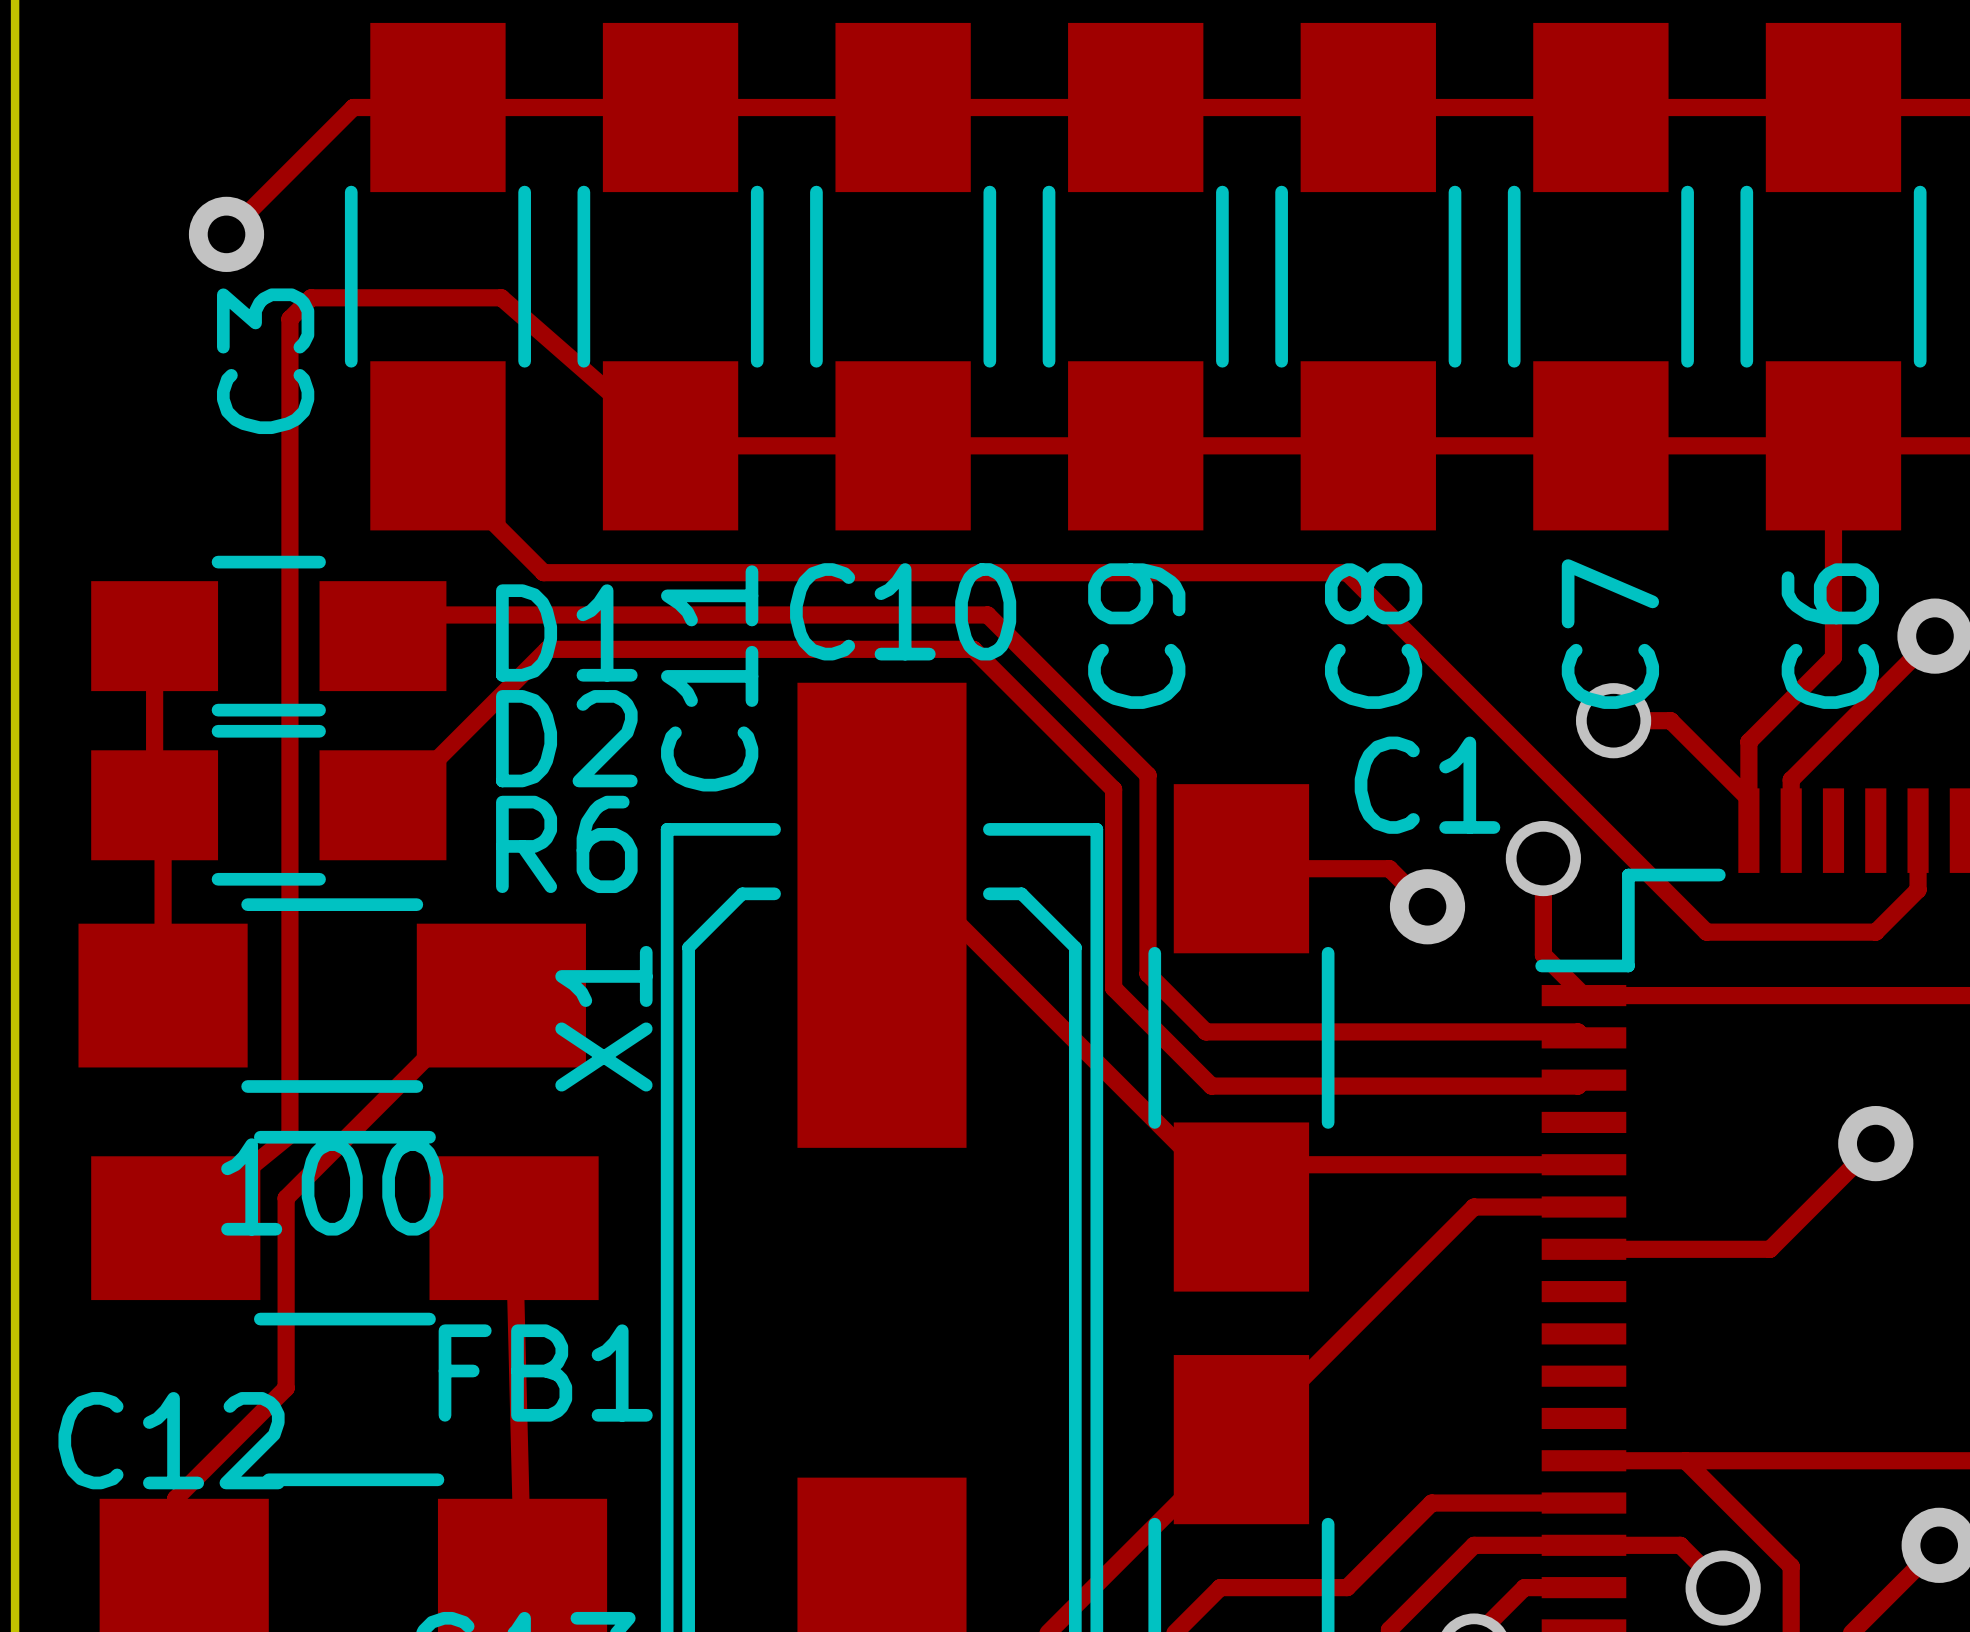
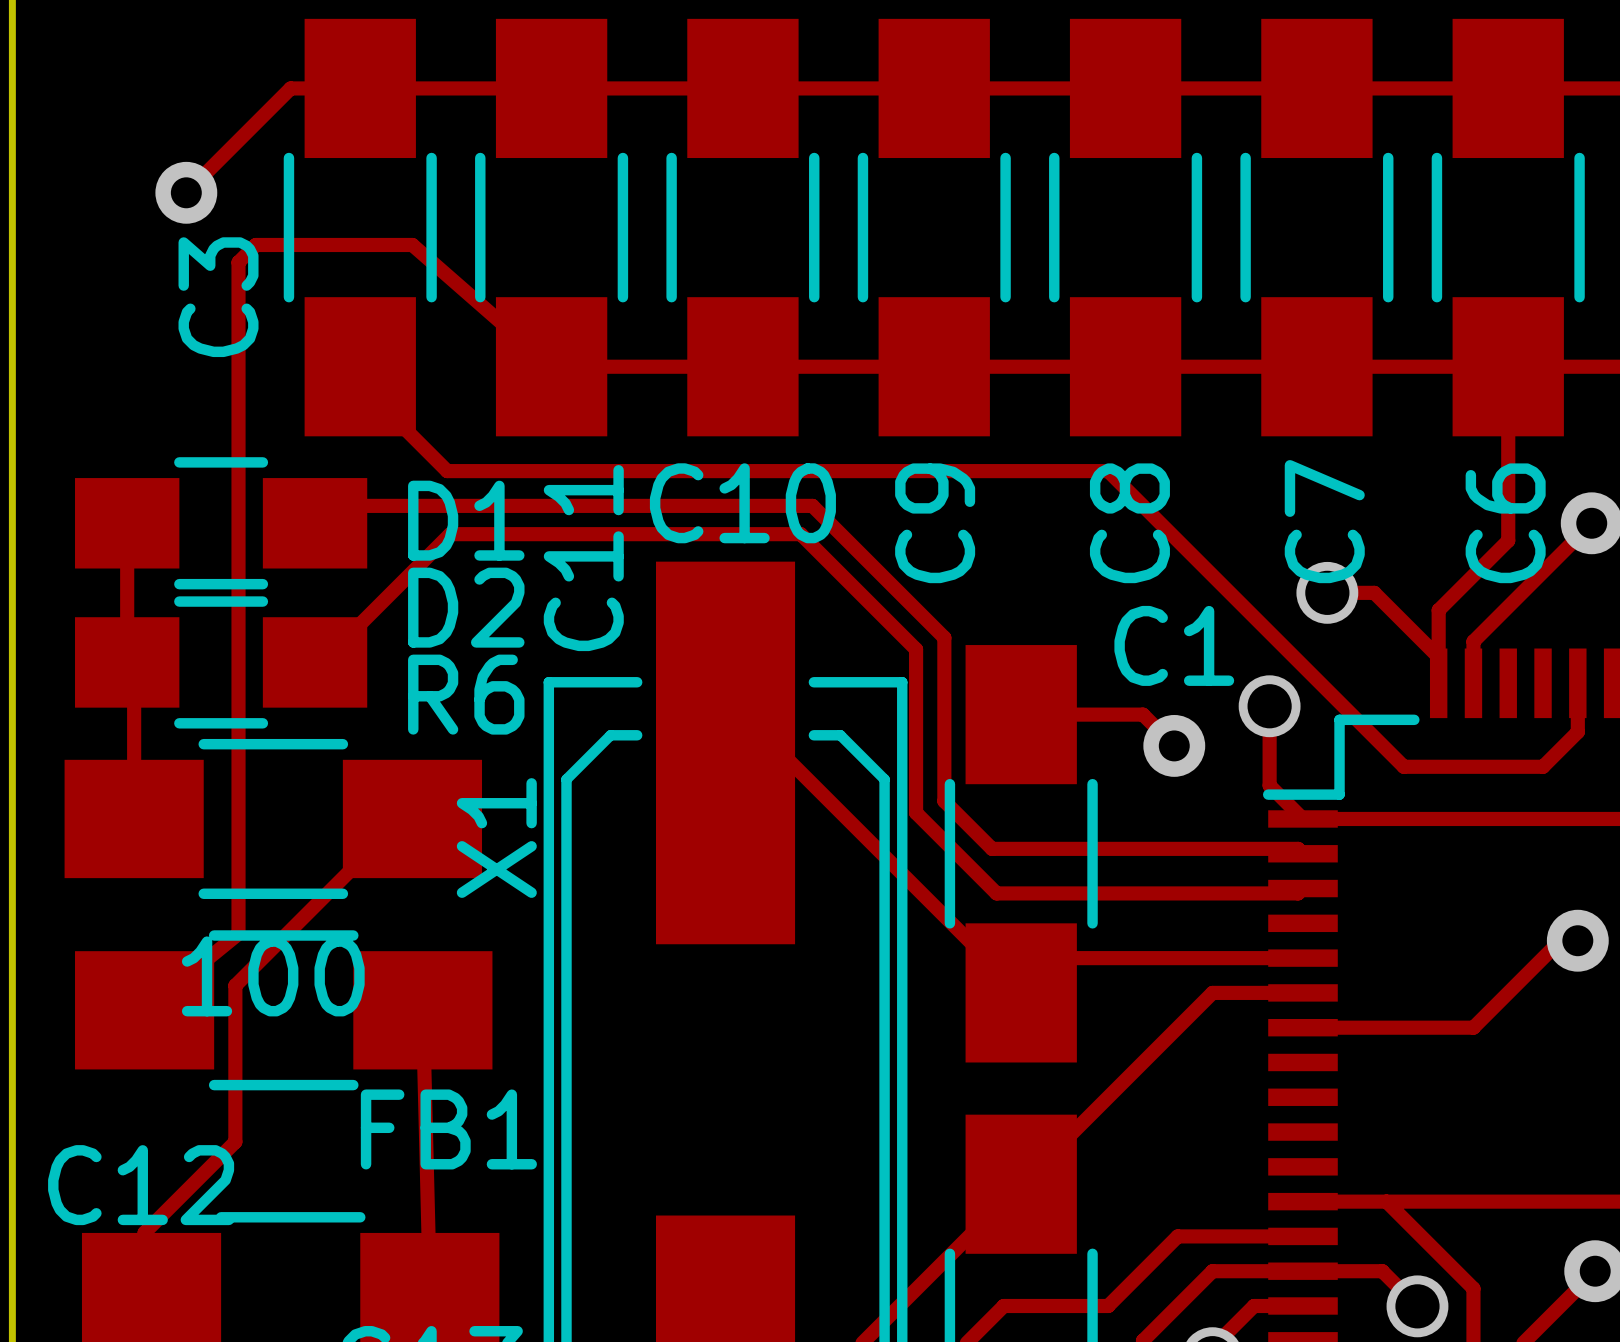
track: (1875, 1143) (1770, 1249) -> (1577, 940) (1560, 940) (1473, 1027) (1456, 1027)
via position: (1875, 1143) -> (1577, 940)

